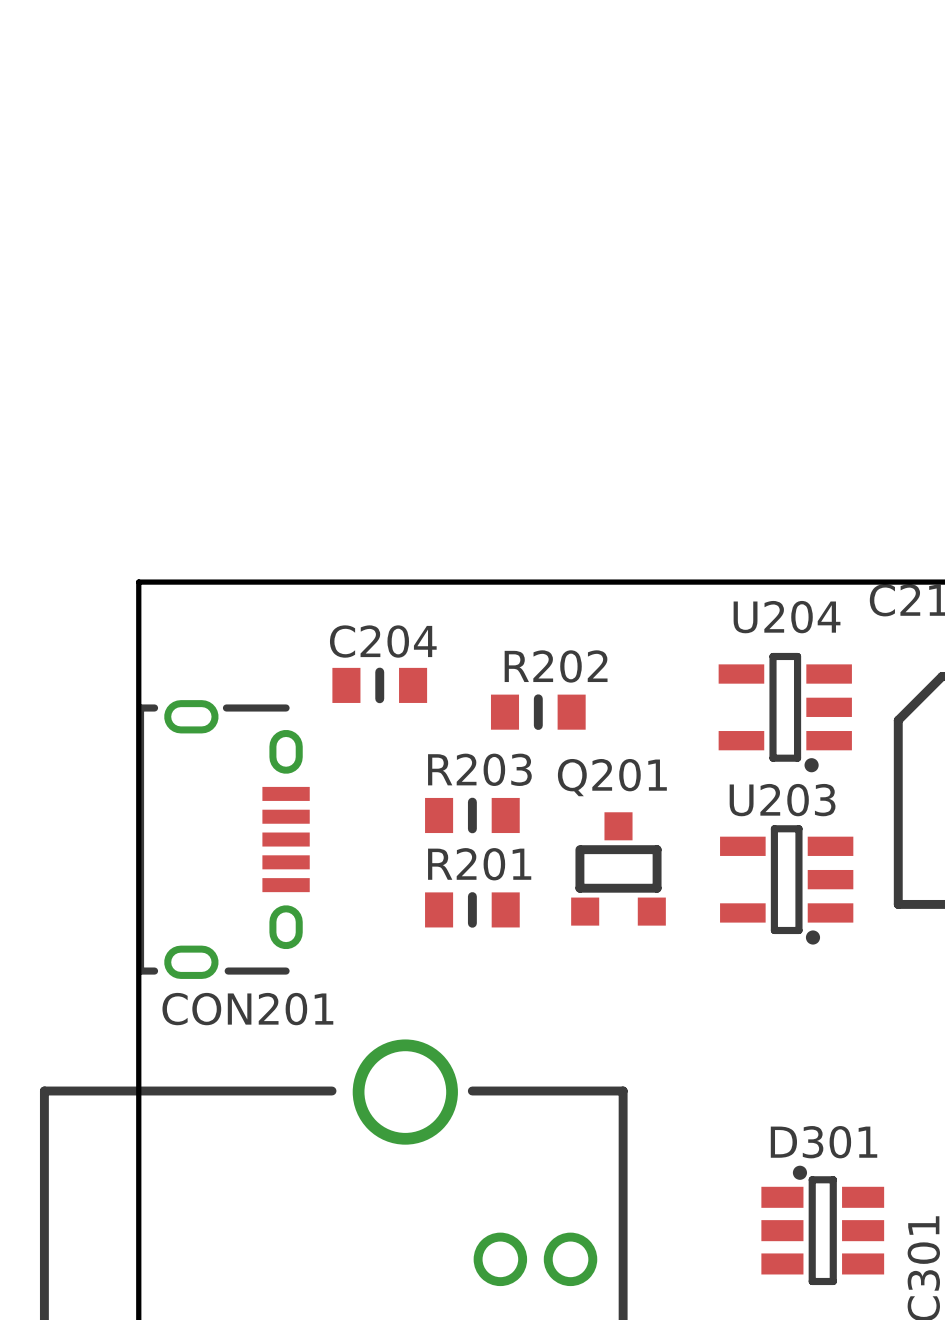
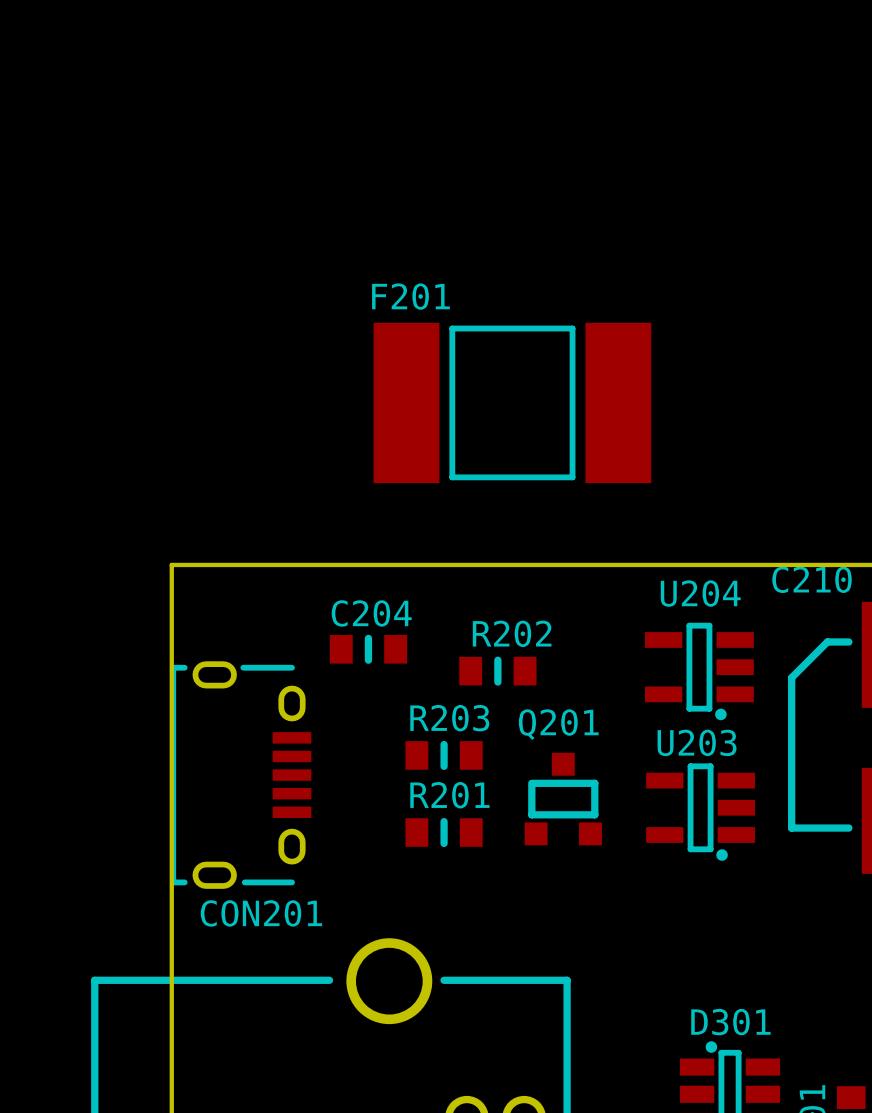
F201: none -> (512, 402)

